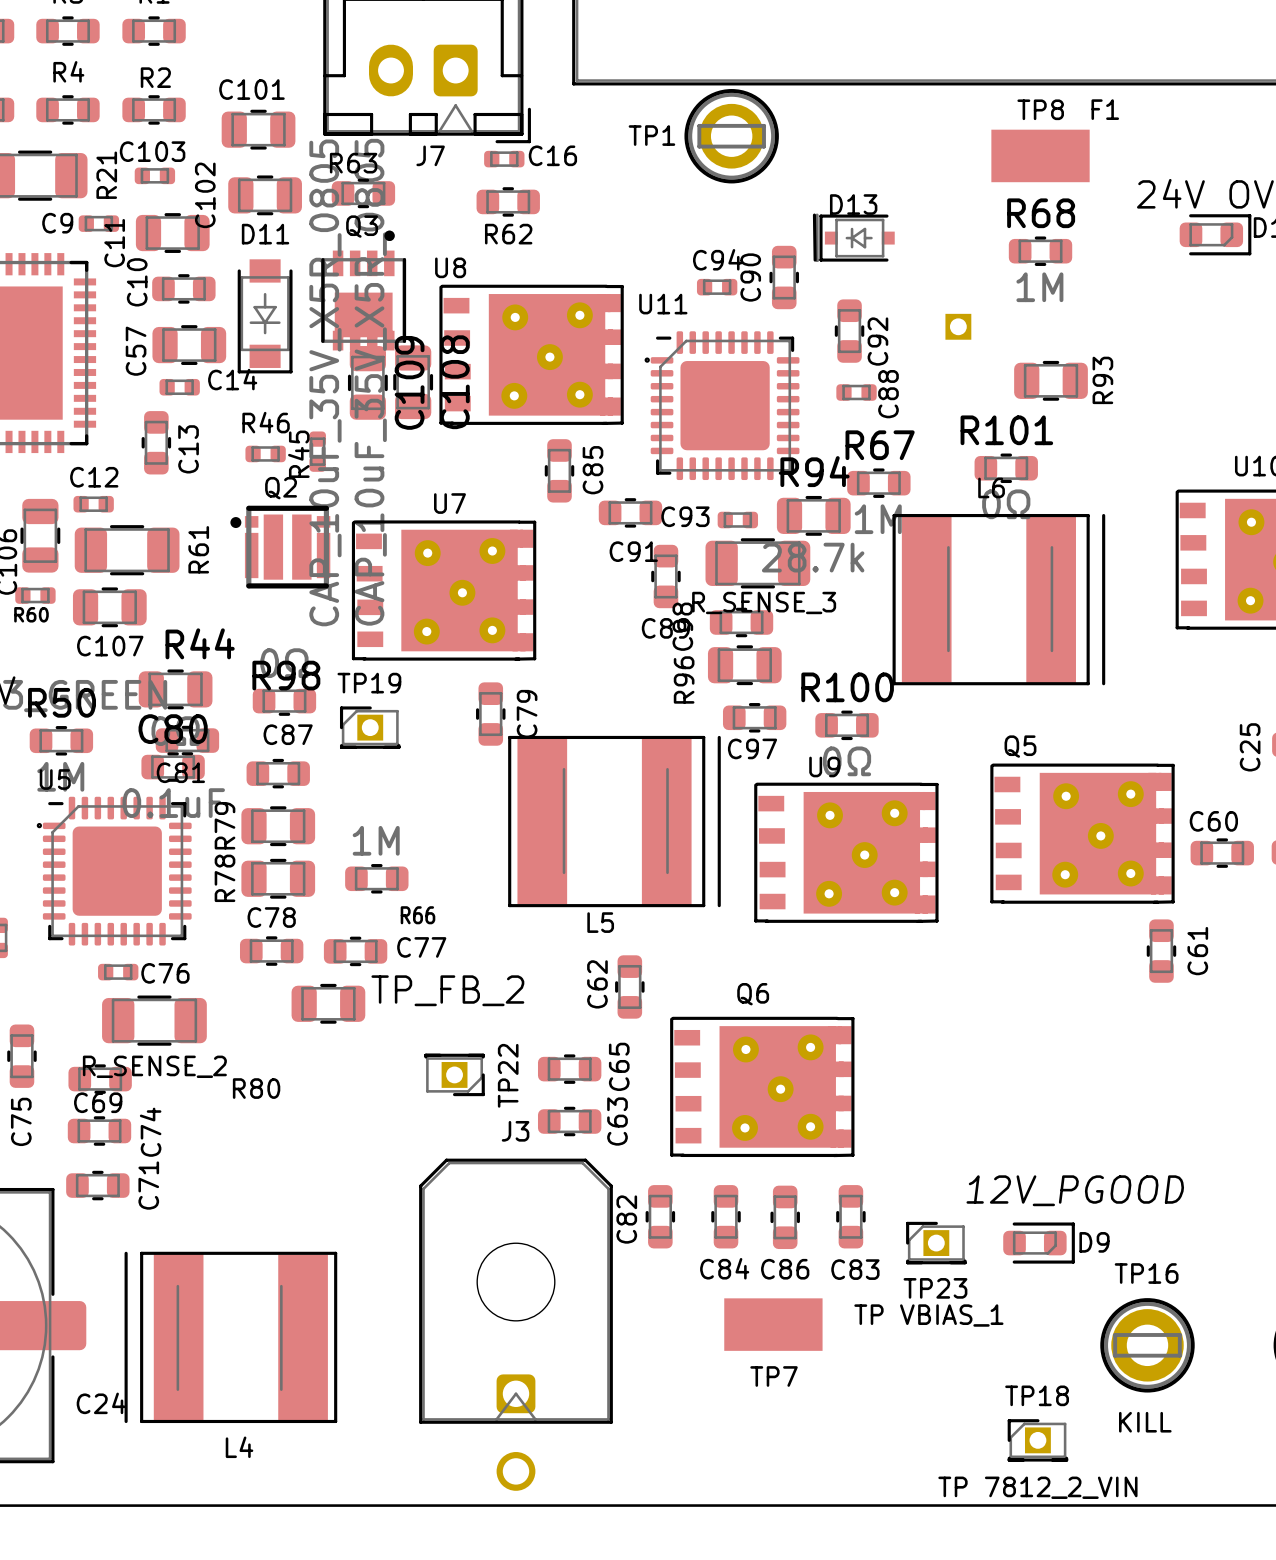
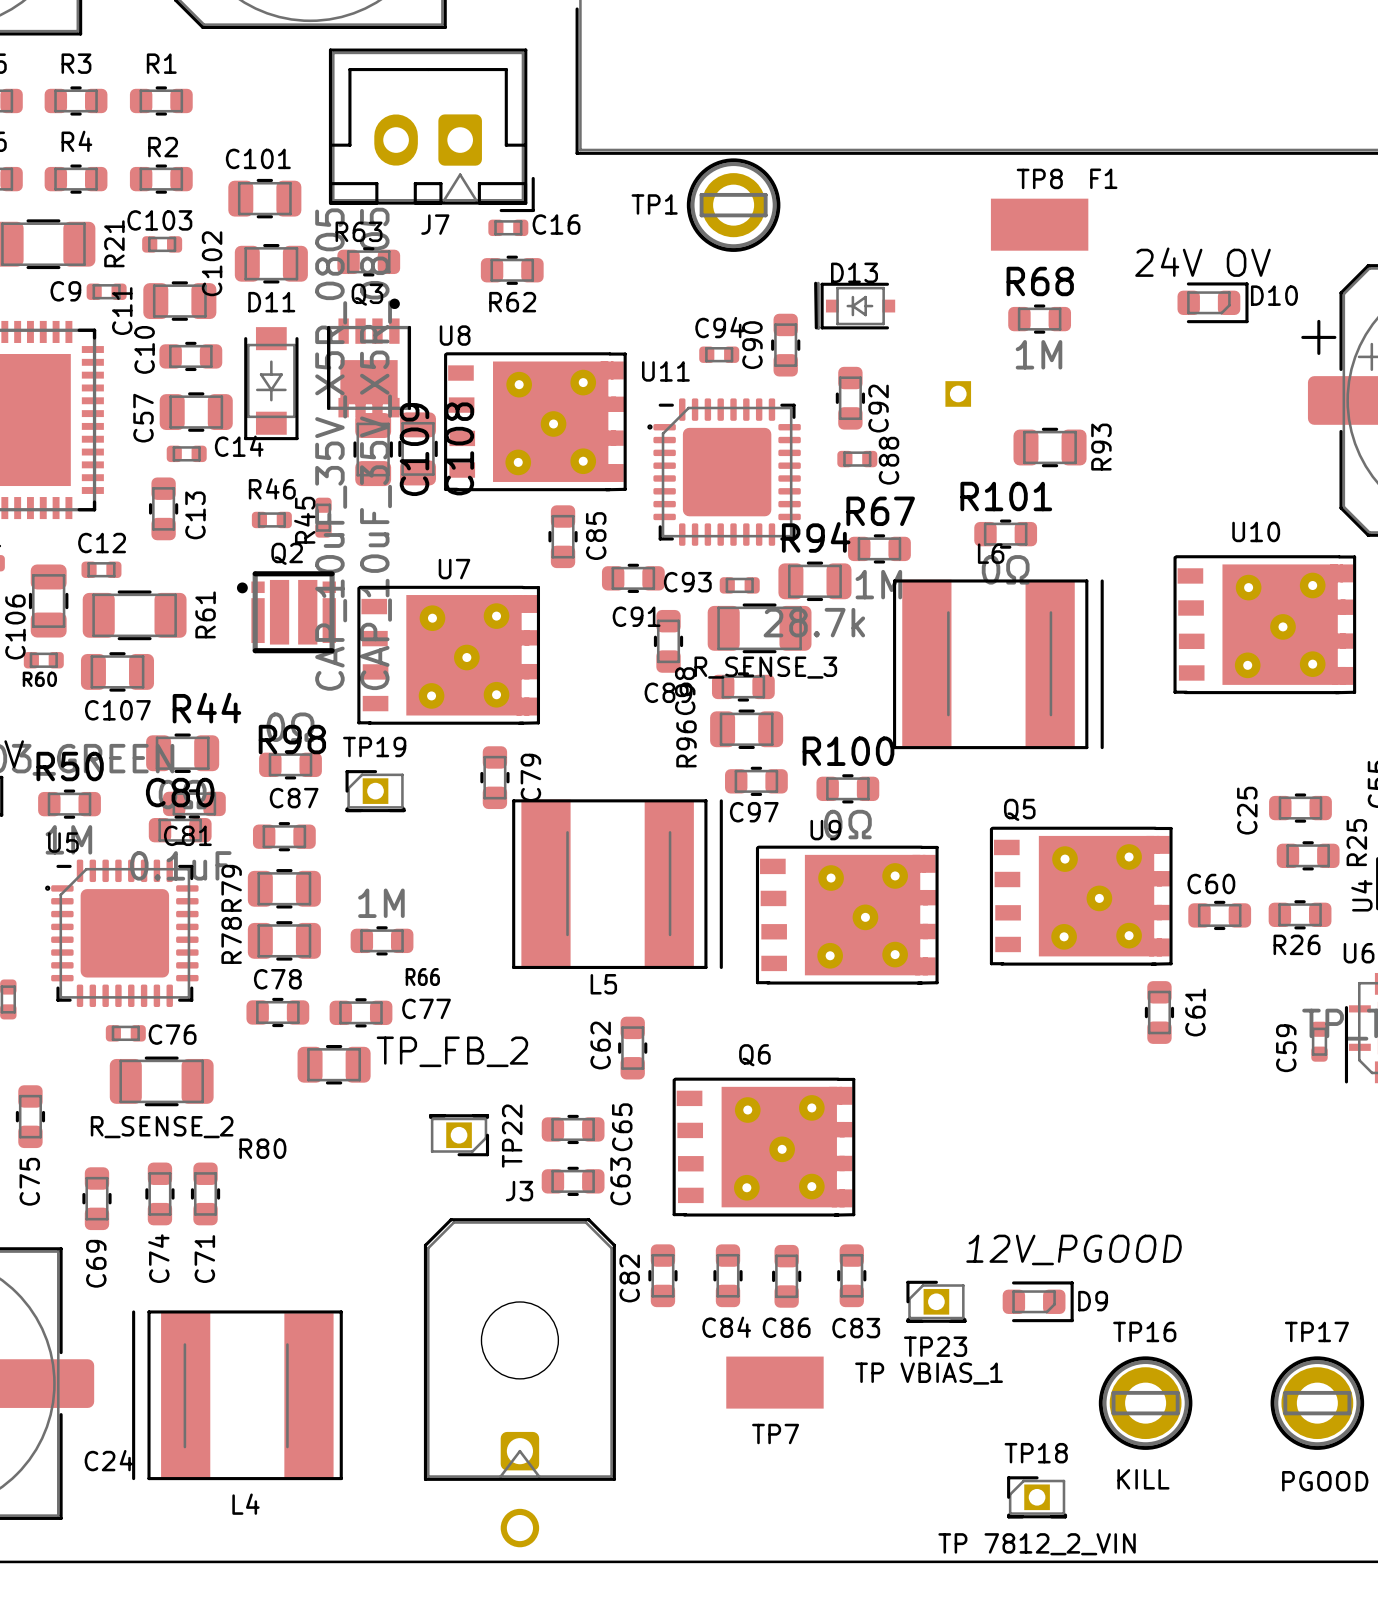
C69 rotation: 0° (100, 1079) -> 90° clockwise (96, 1198)
C69 position: (100, 1079) -> (96, 1198)
C74 rotation: 0° (99, 1131) -> 90° clockwise (159, 1193)
C74 position: (99, 1131) -> (159, 1193)
C71 rotation: 0° (97, 1185) -> 90° clockwise (205, 1193)
C71 position: (97, 1185) -> (205, 1193)

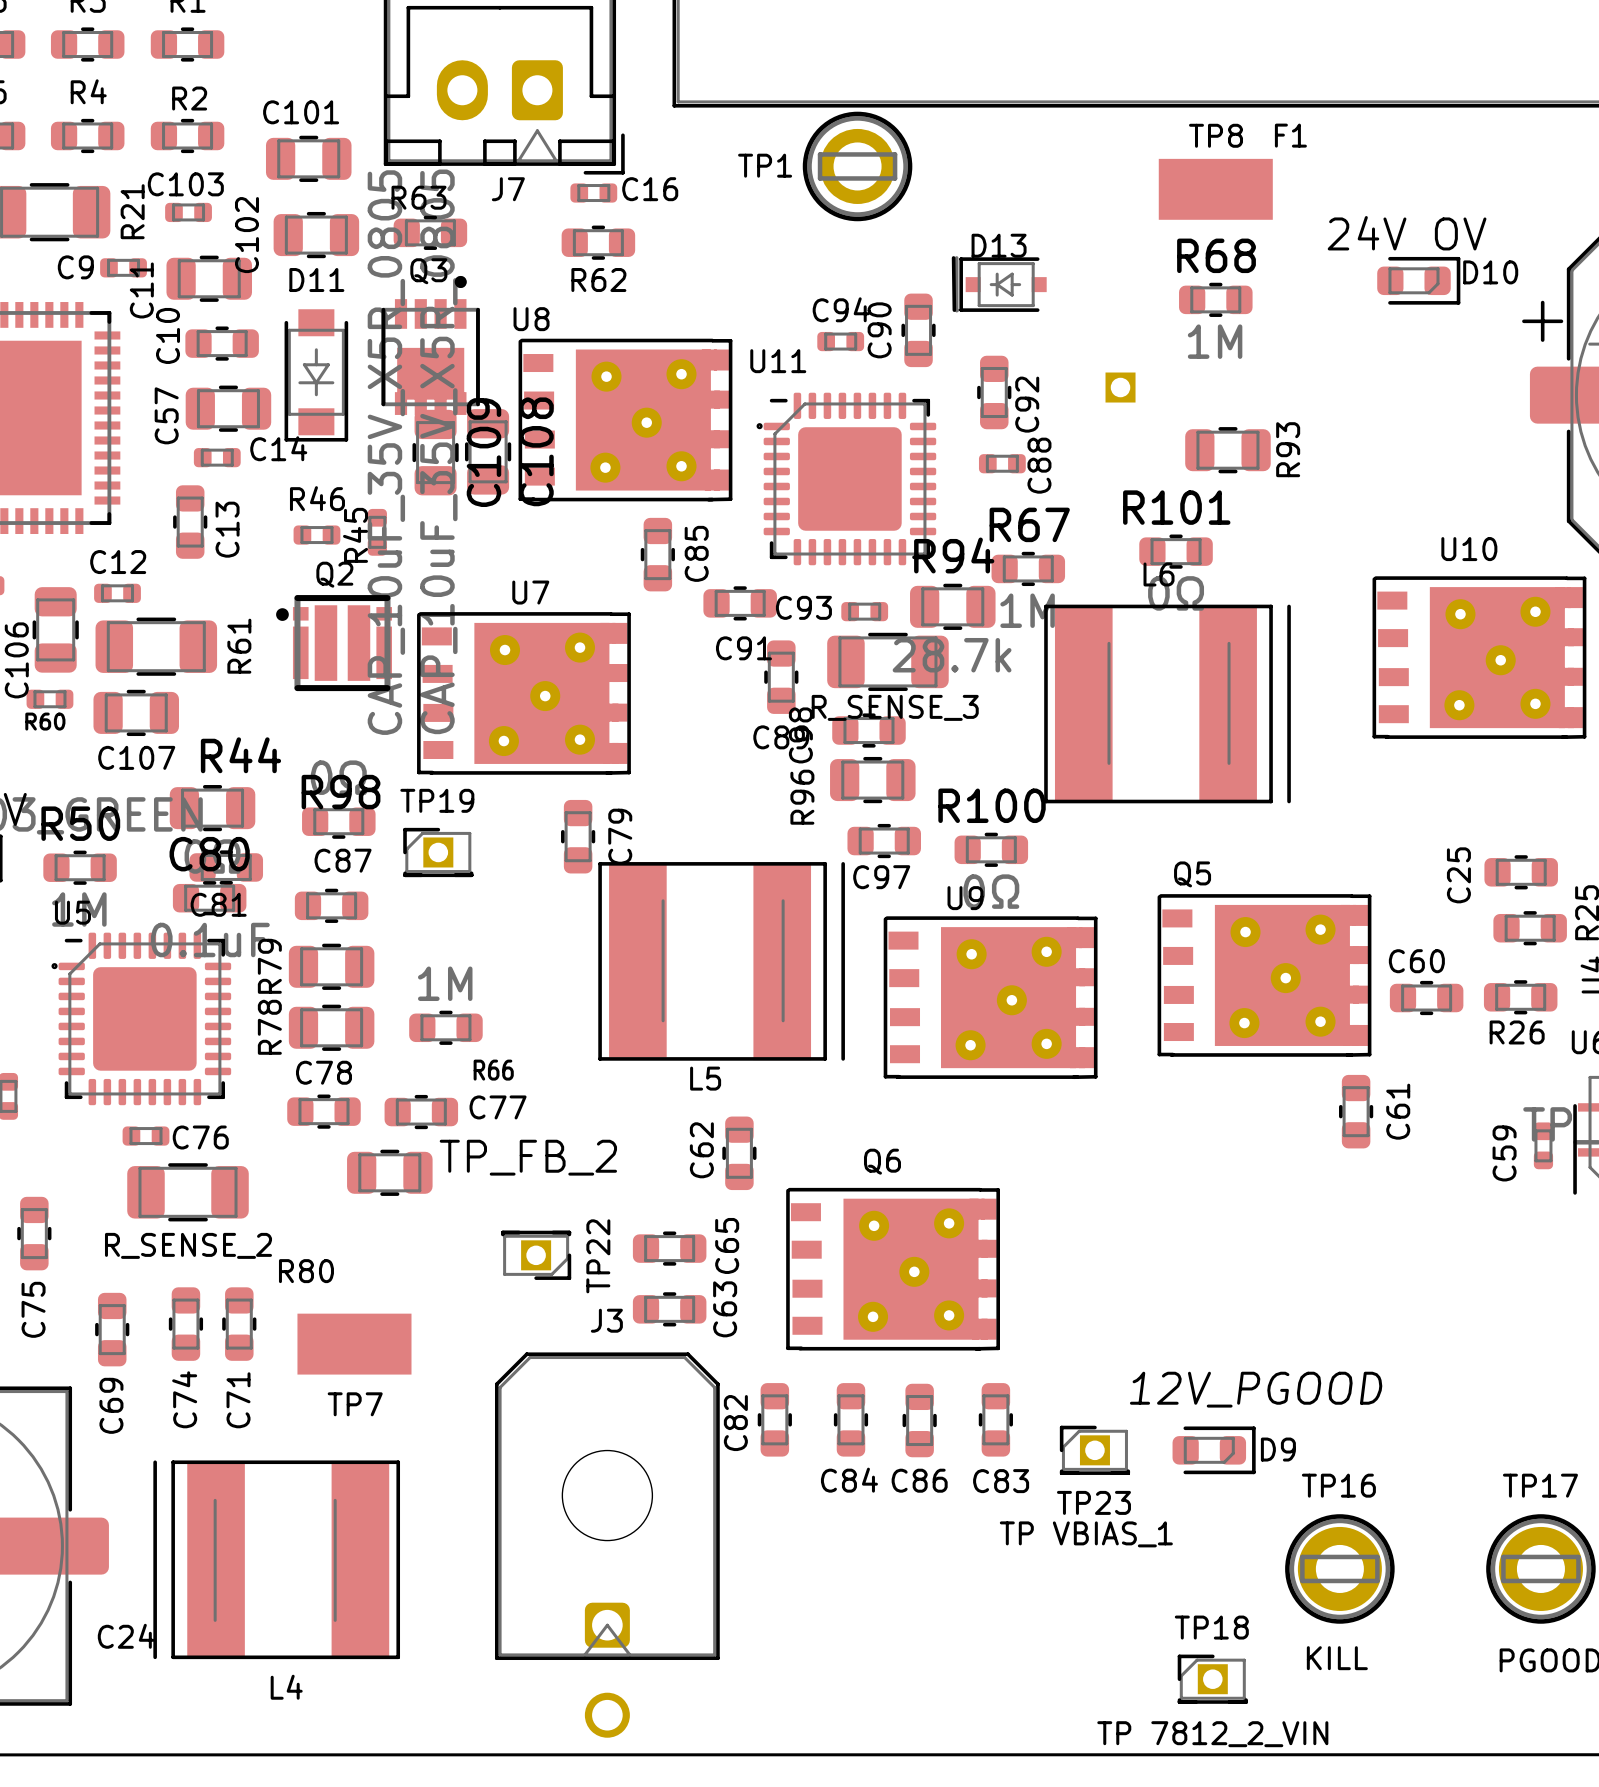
TP7 position: (774, 1382) -> (354, 1344)

